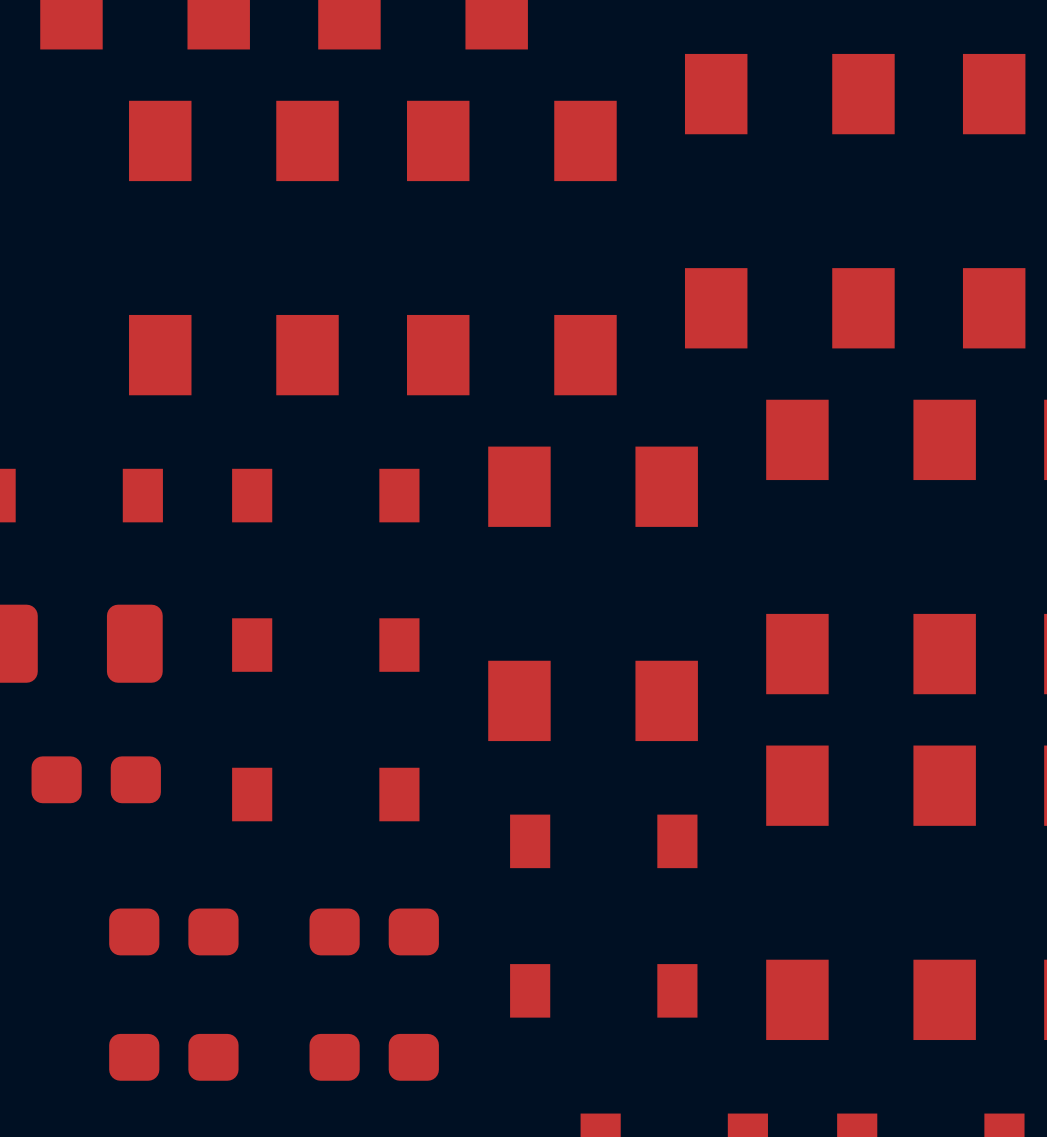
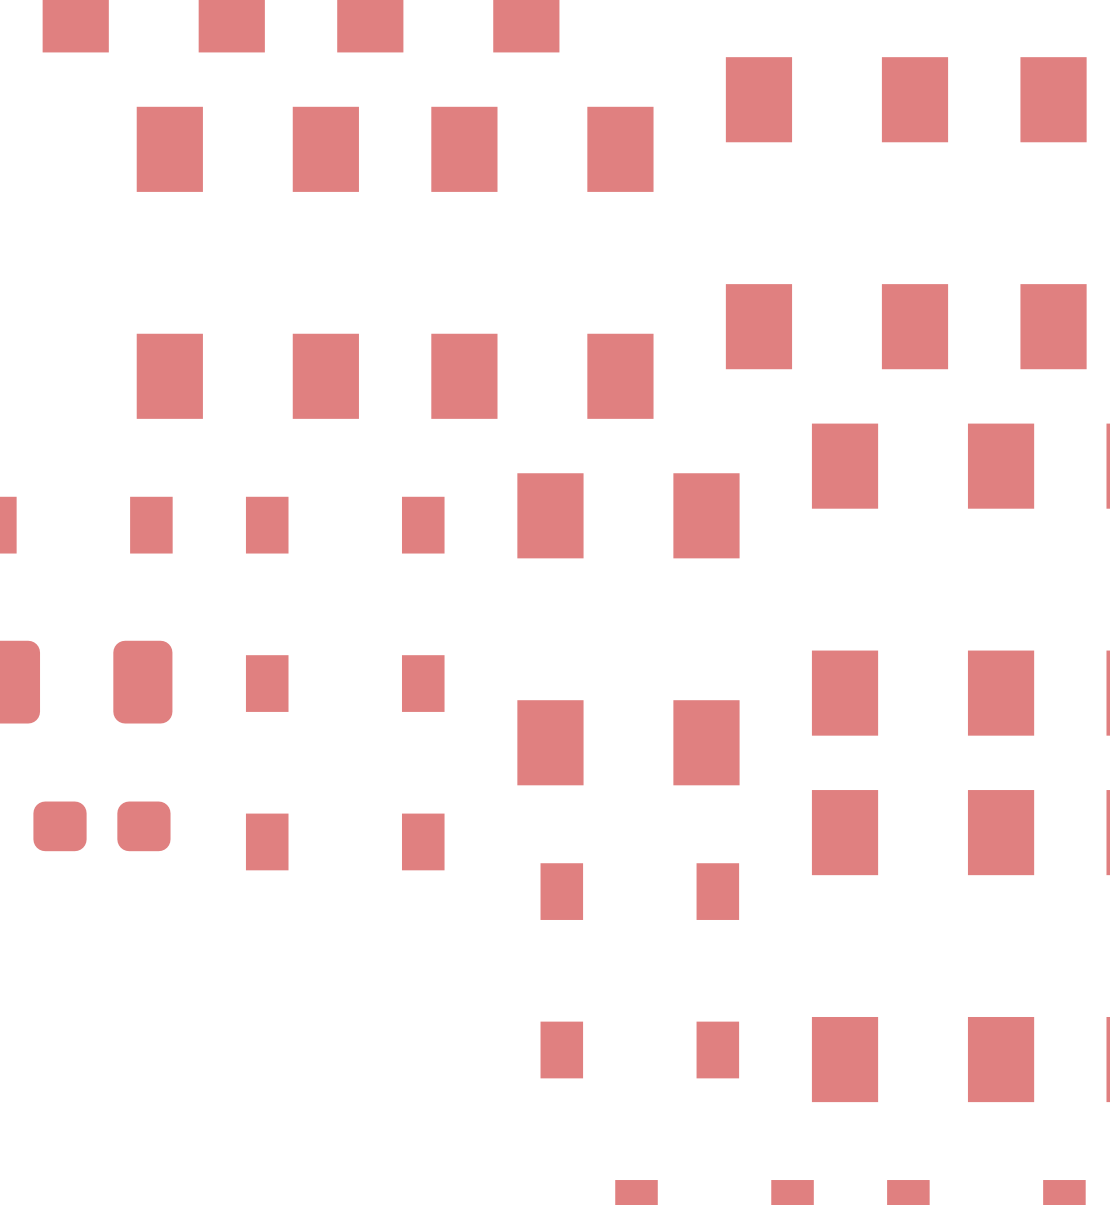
part: (173, 931) -> none
part: (374, 931) -> none
part: (173, 1057) -> none
part: (374, 1057) -> none

